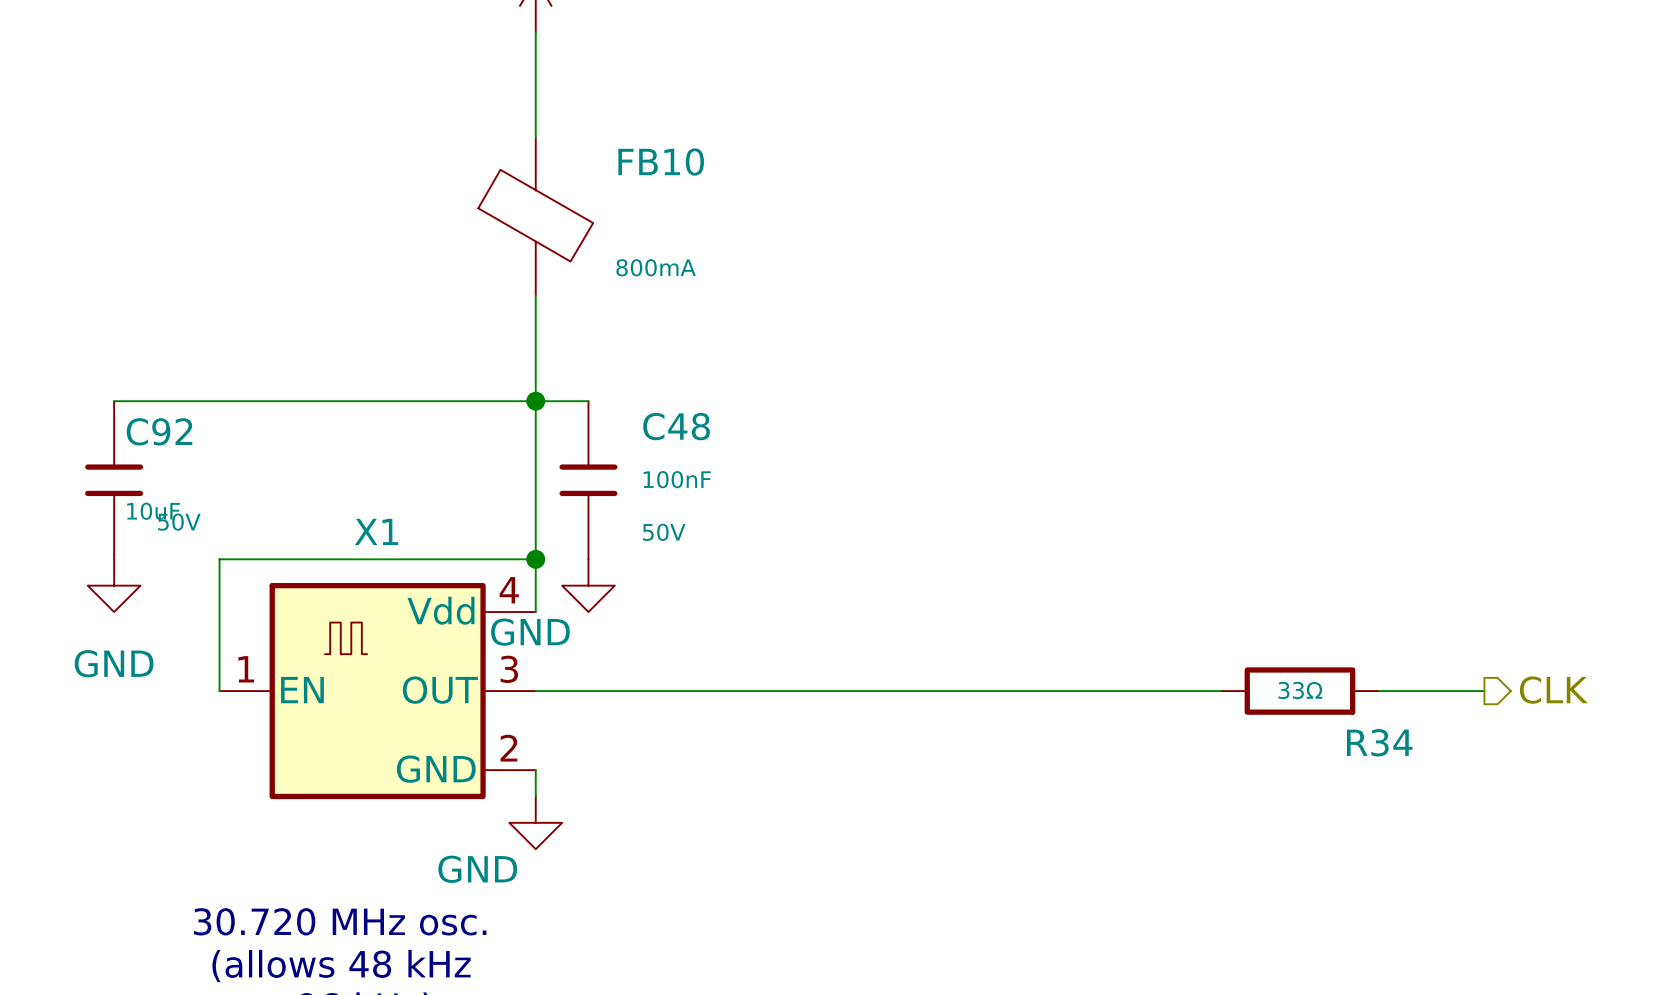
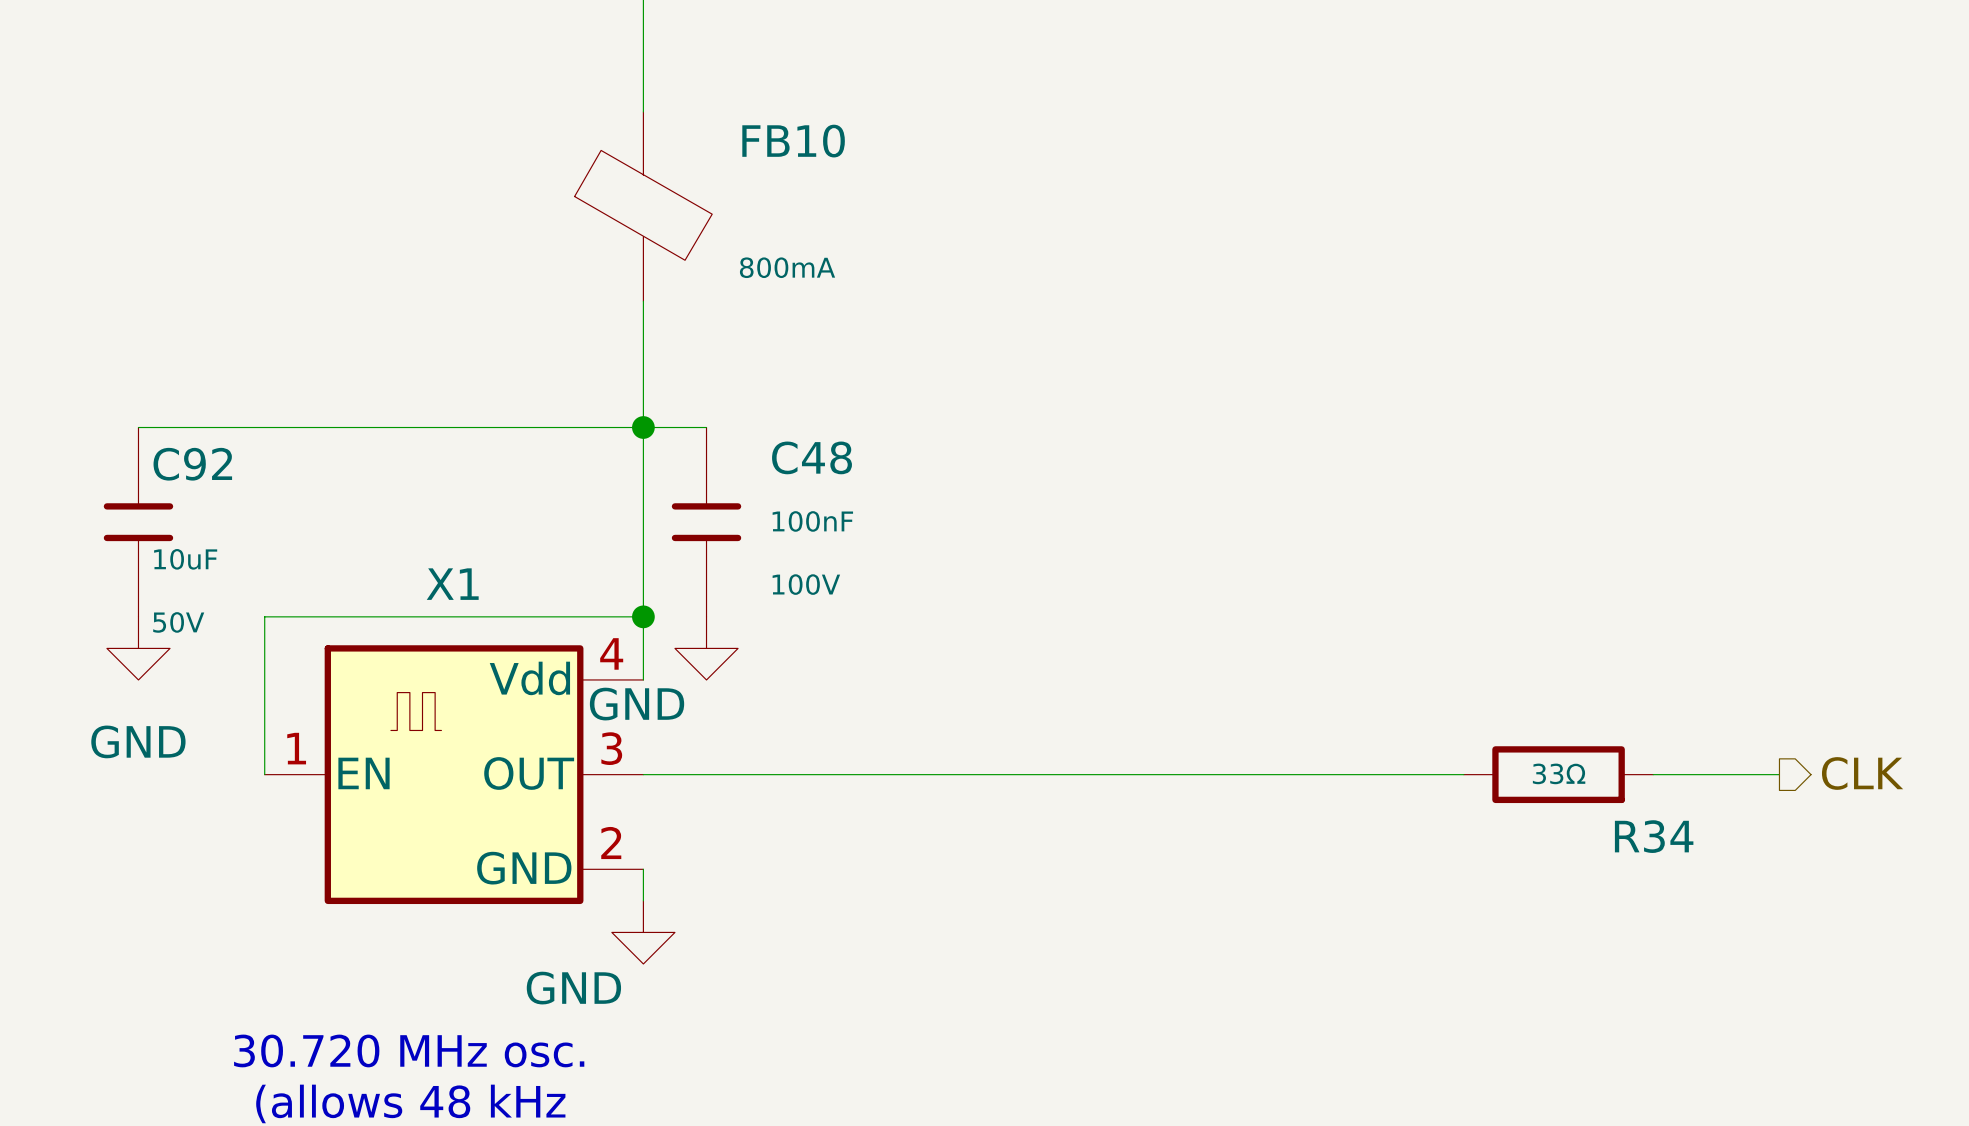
C92 text position: 50V (179, 522) -> 50V (178, 622)
C48 text: 50V (664, 532) -> 100V (806, 584)

